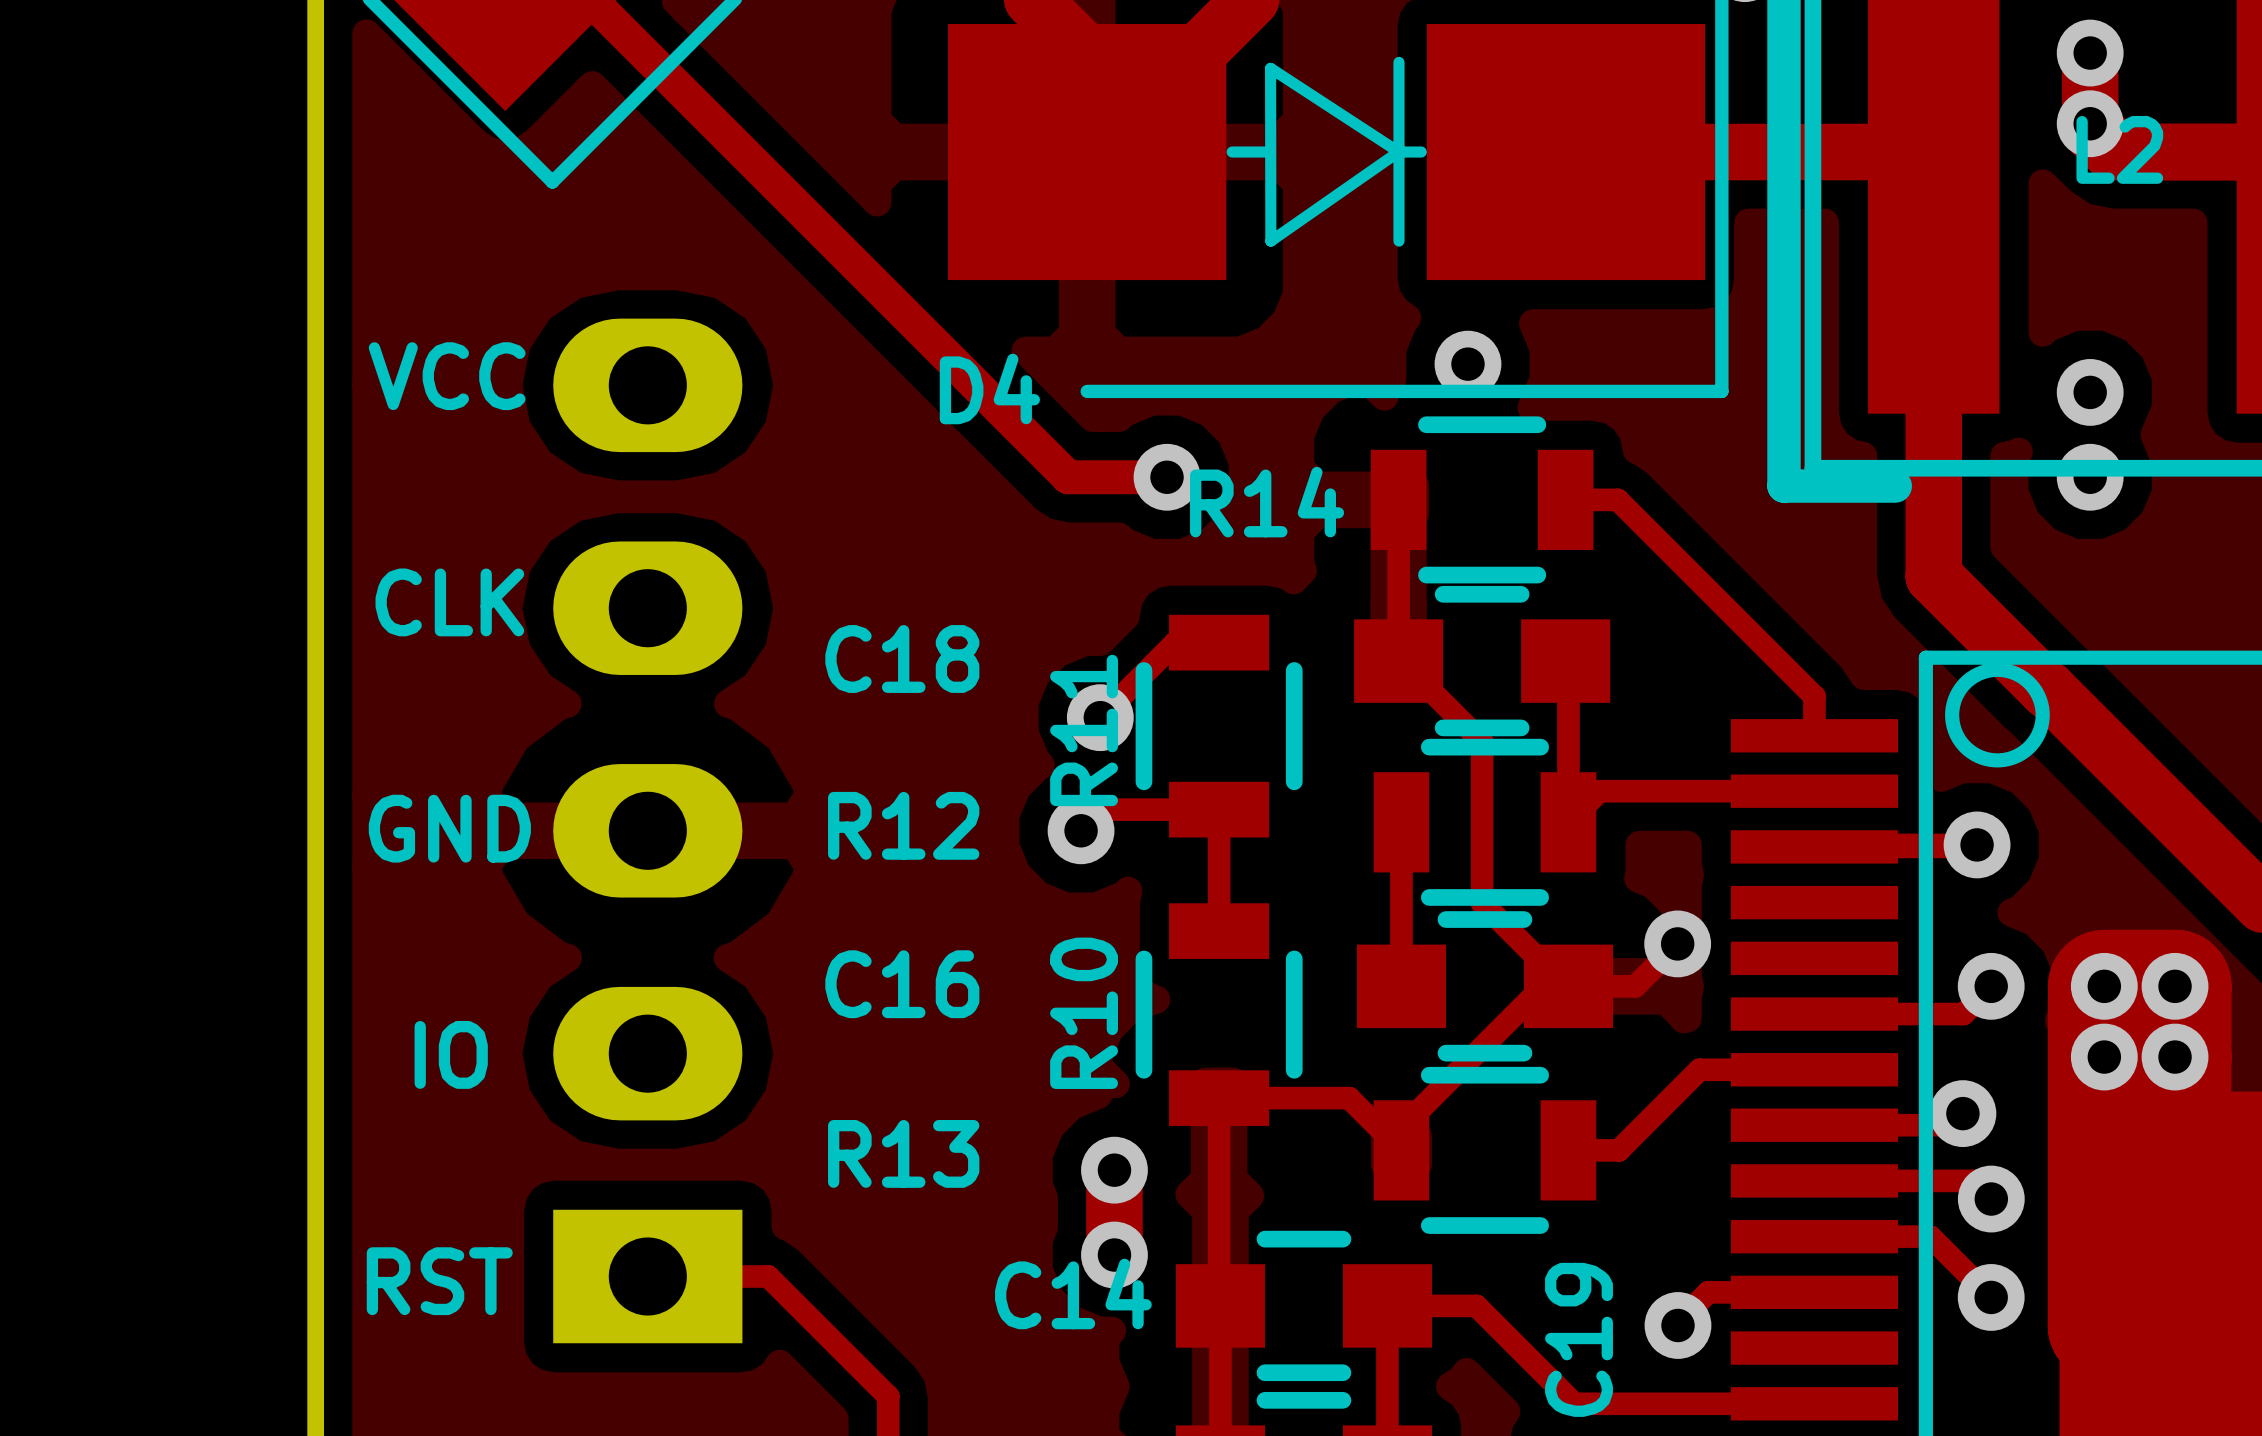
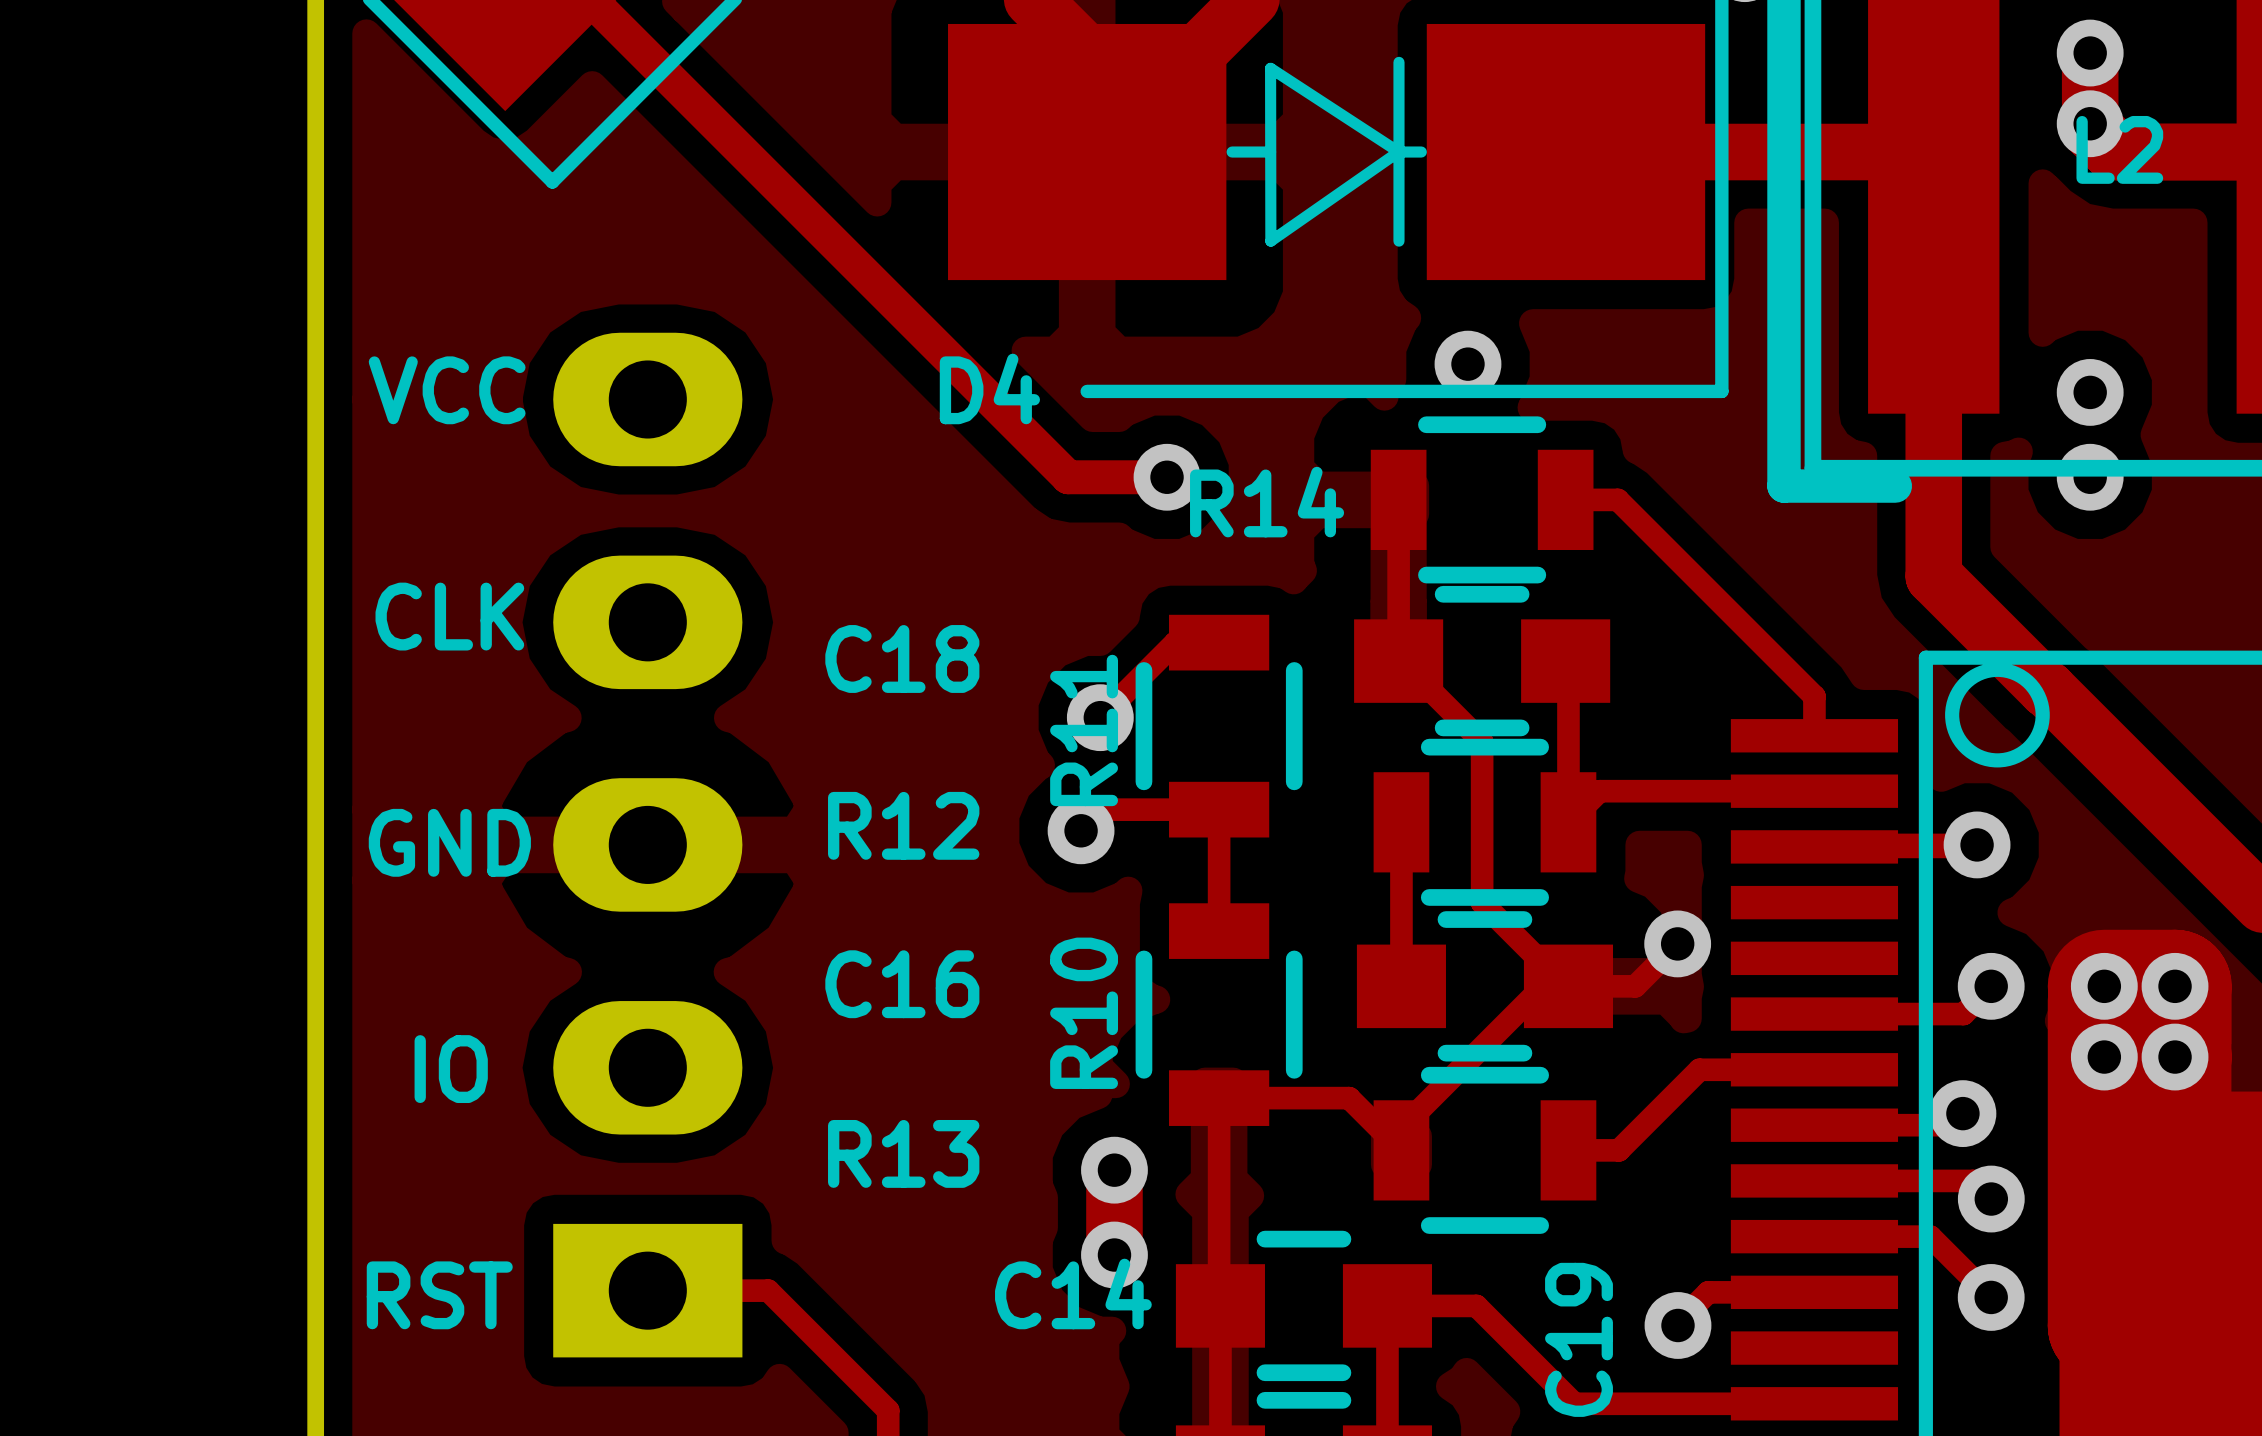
text position: VCC (447, 376) -> VCC (447, 390)
text position: CLK (449, 602) -> CLK (449, 616)
text position: GND (449, 828) -> GND (449, 842)
part position: (647, 830) -> (647, 845)
text position: IO (451, 1054) -> IO (451, 1069)
track: (647, 1276) (768, 1276) (888, 1396) (888, 1410) -> (647, 1290) (768, 1290) (888, 1410)
text position: RST (439, 1281) -> RST (439, 1295)

